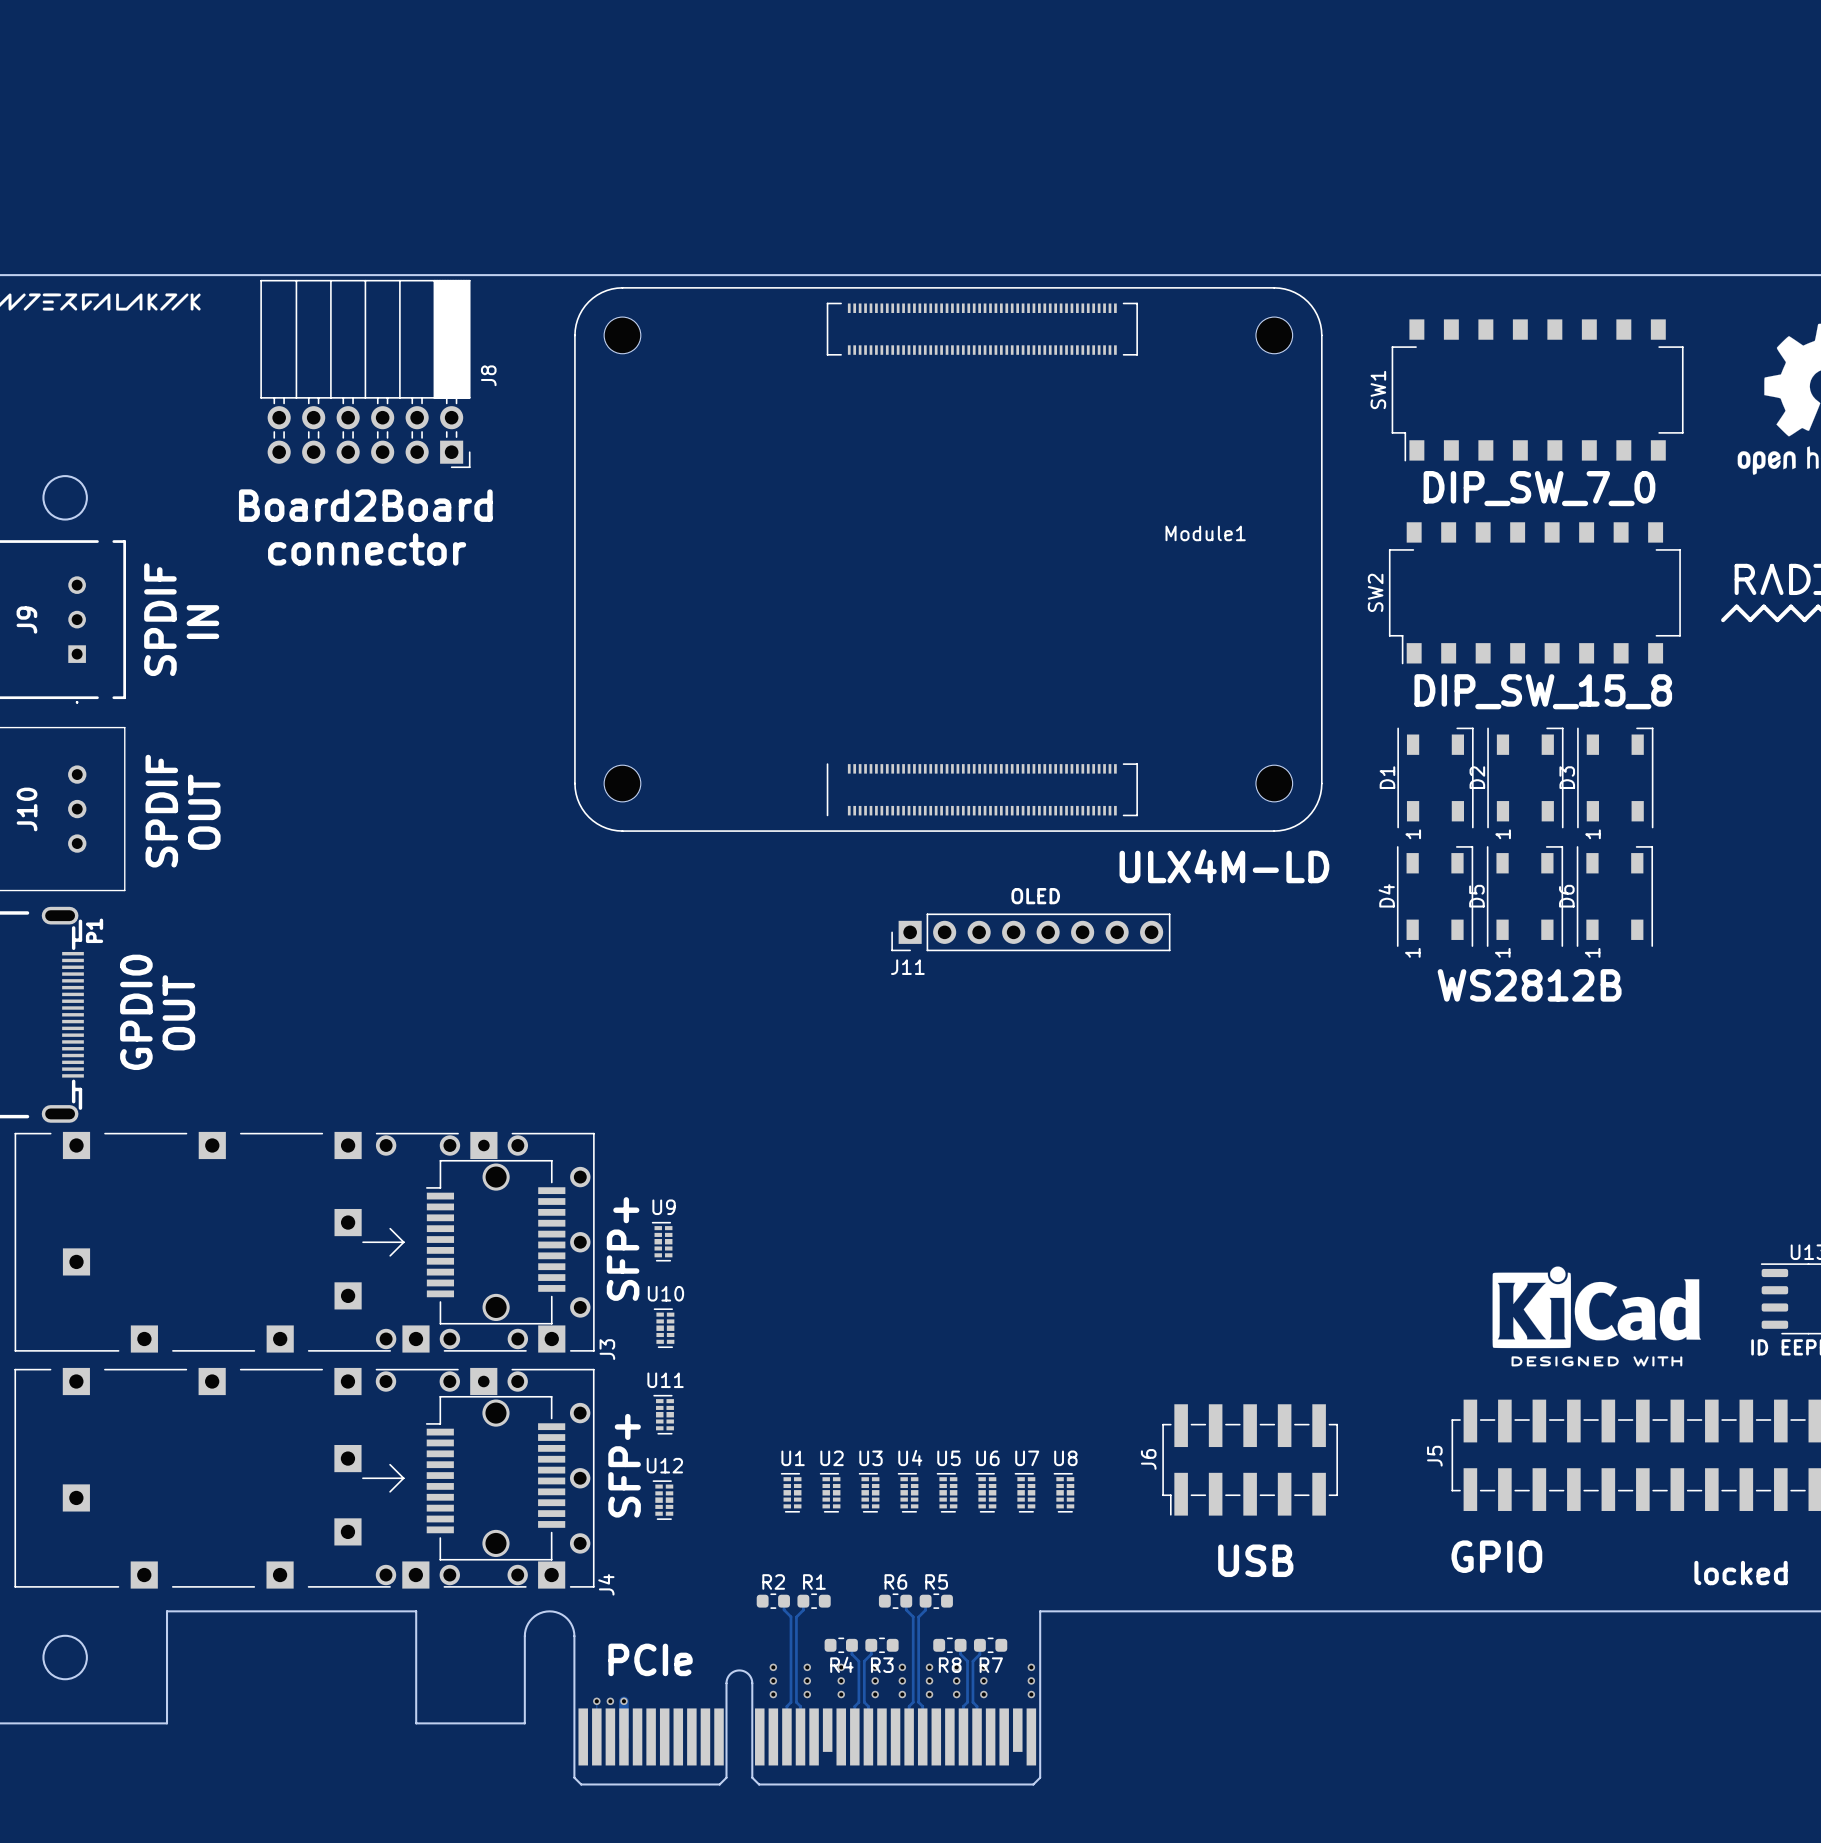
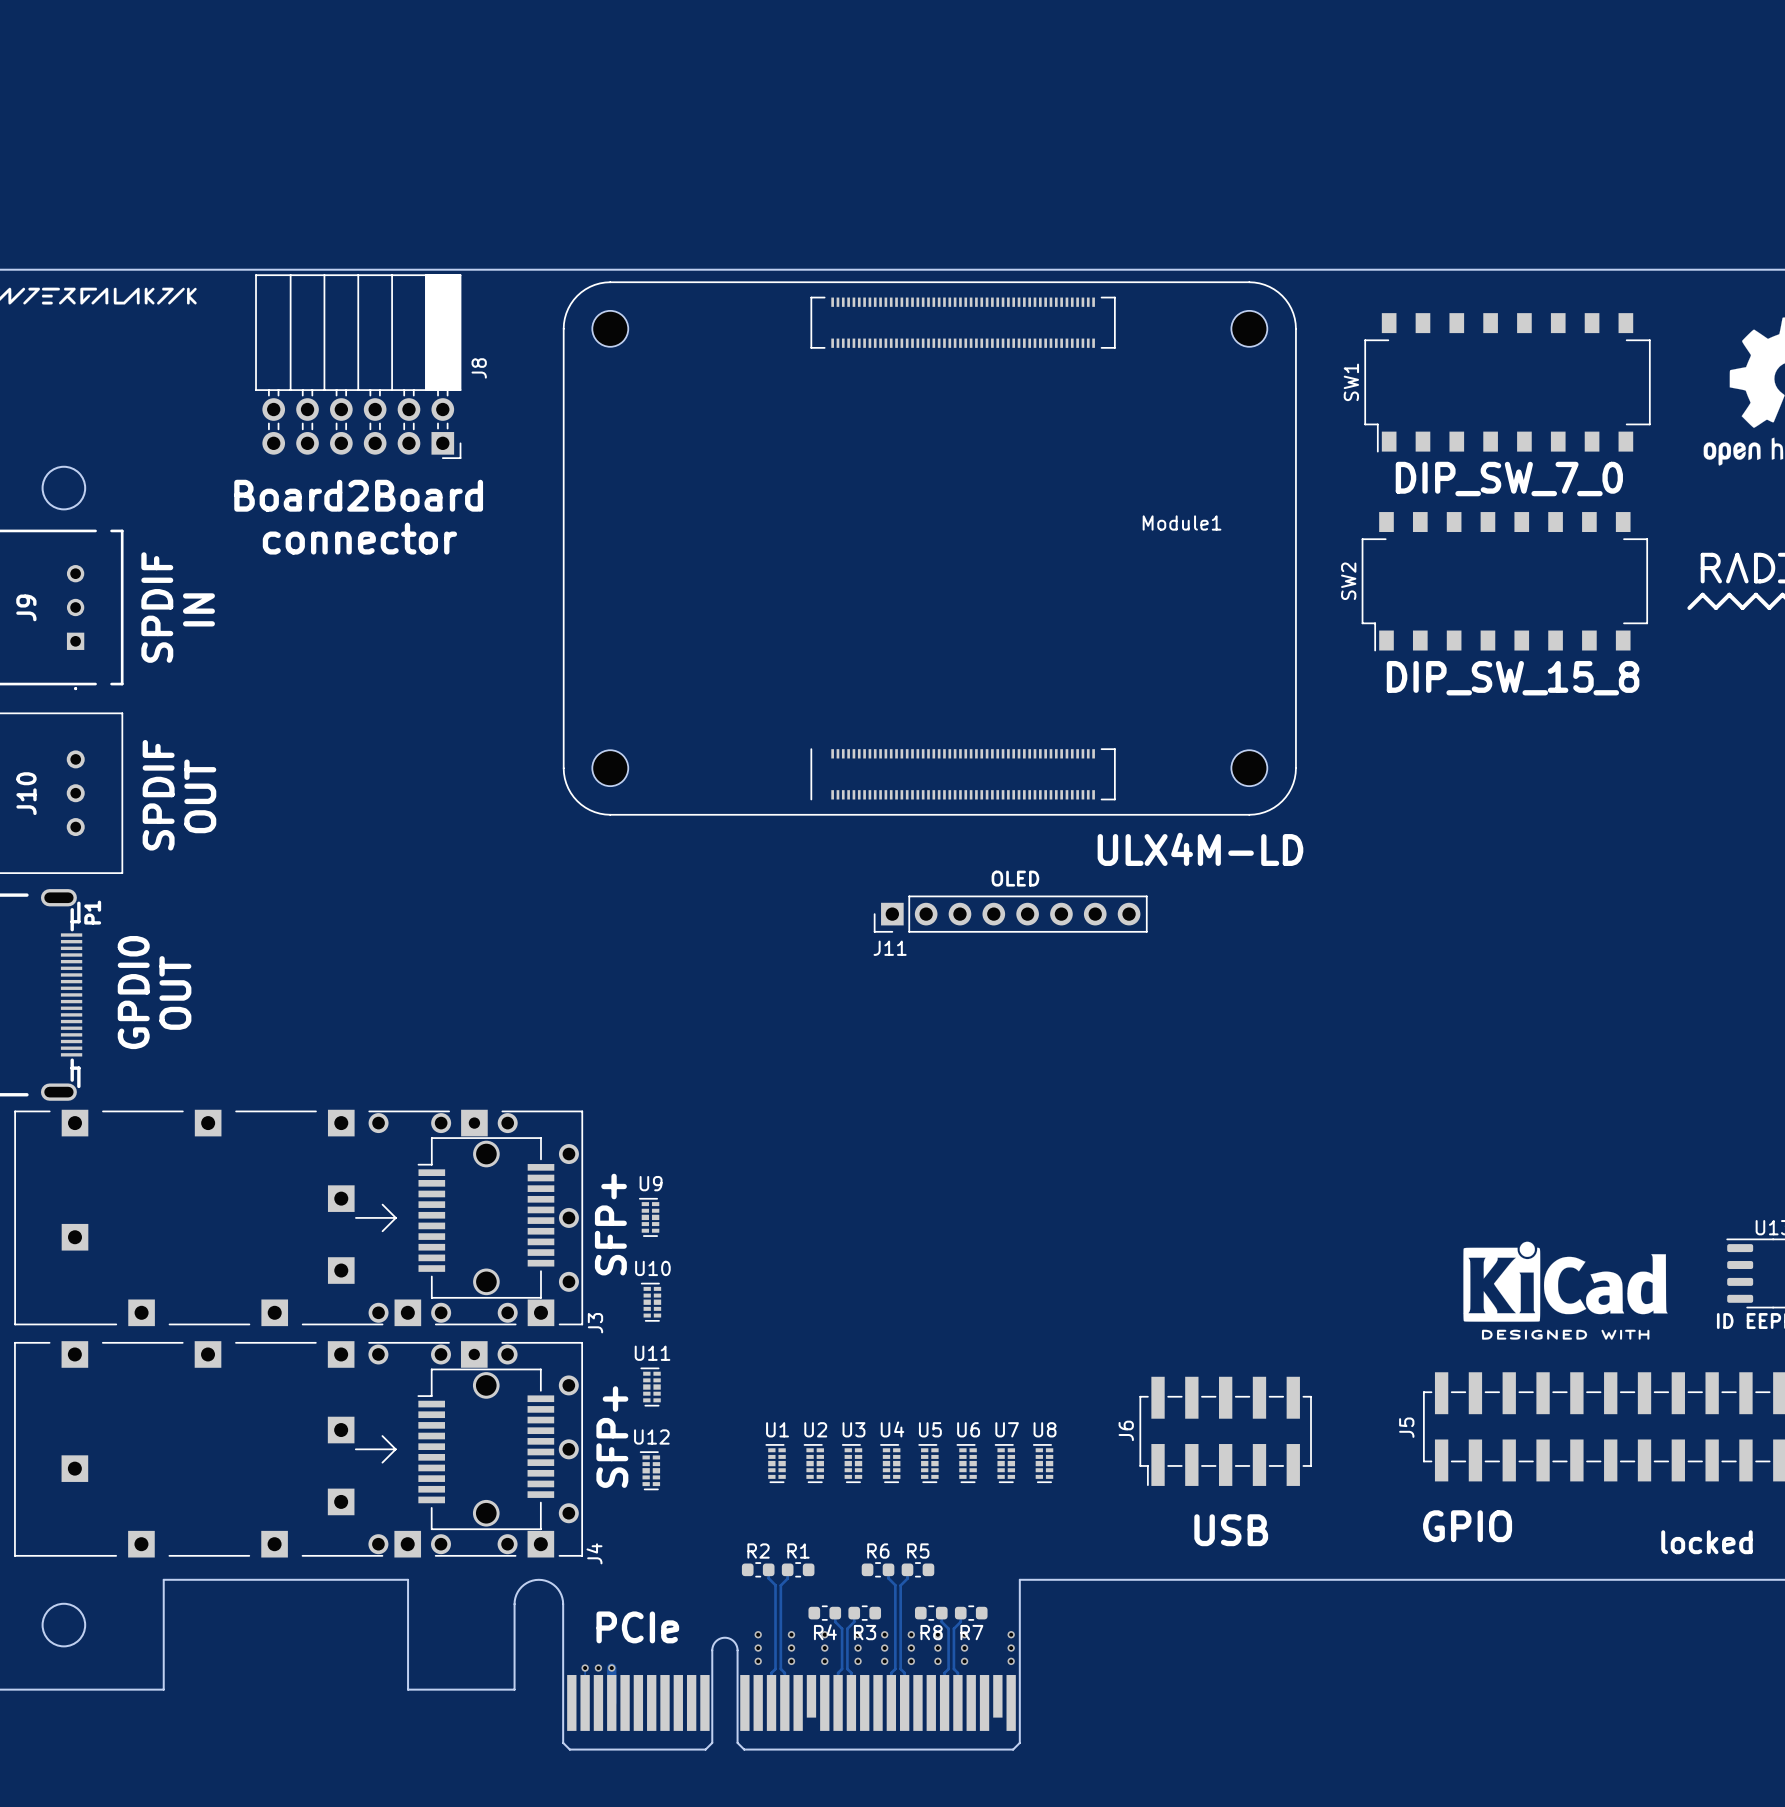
D1: (1435, 777) -> none
D2: (1525, 777) -> none
D3: (1615, 777) -> none
D4: (1435, 896) -> none
D5: (1524, 896) -> none
D6: (1614, 896) -> none
text: WS2812B (1529, 985) -> none

